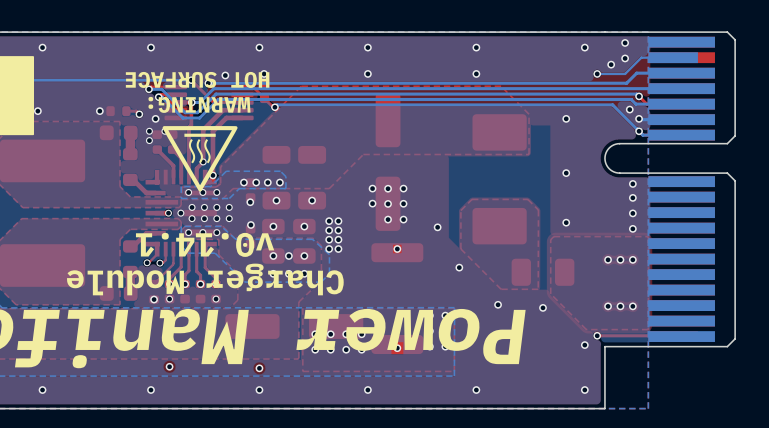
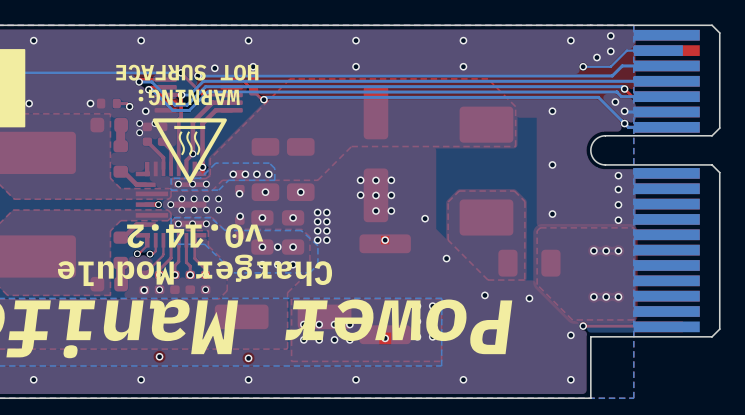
text: v0.14.1 (205, 244) -> v0.14.2 (195, 236)

